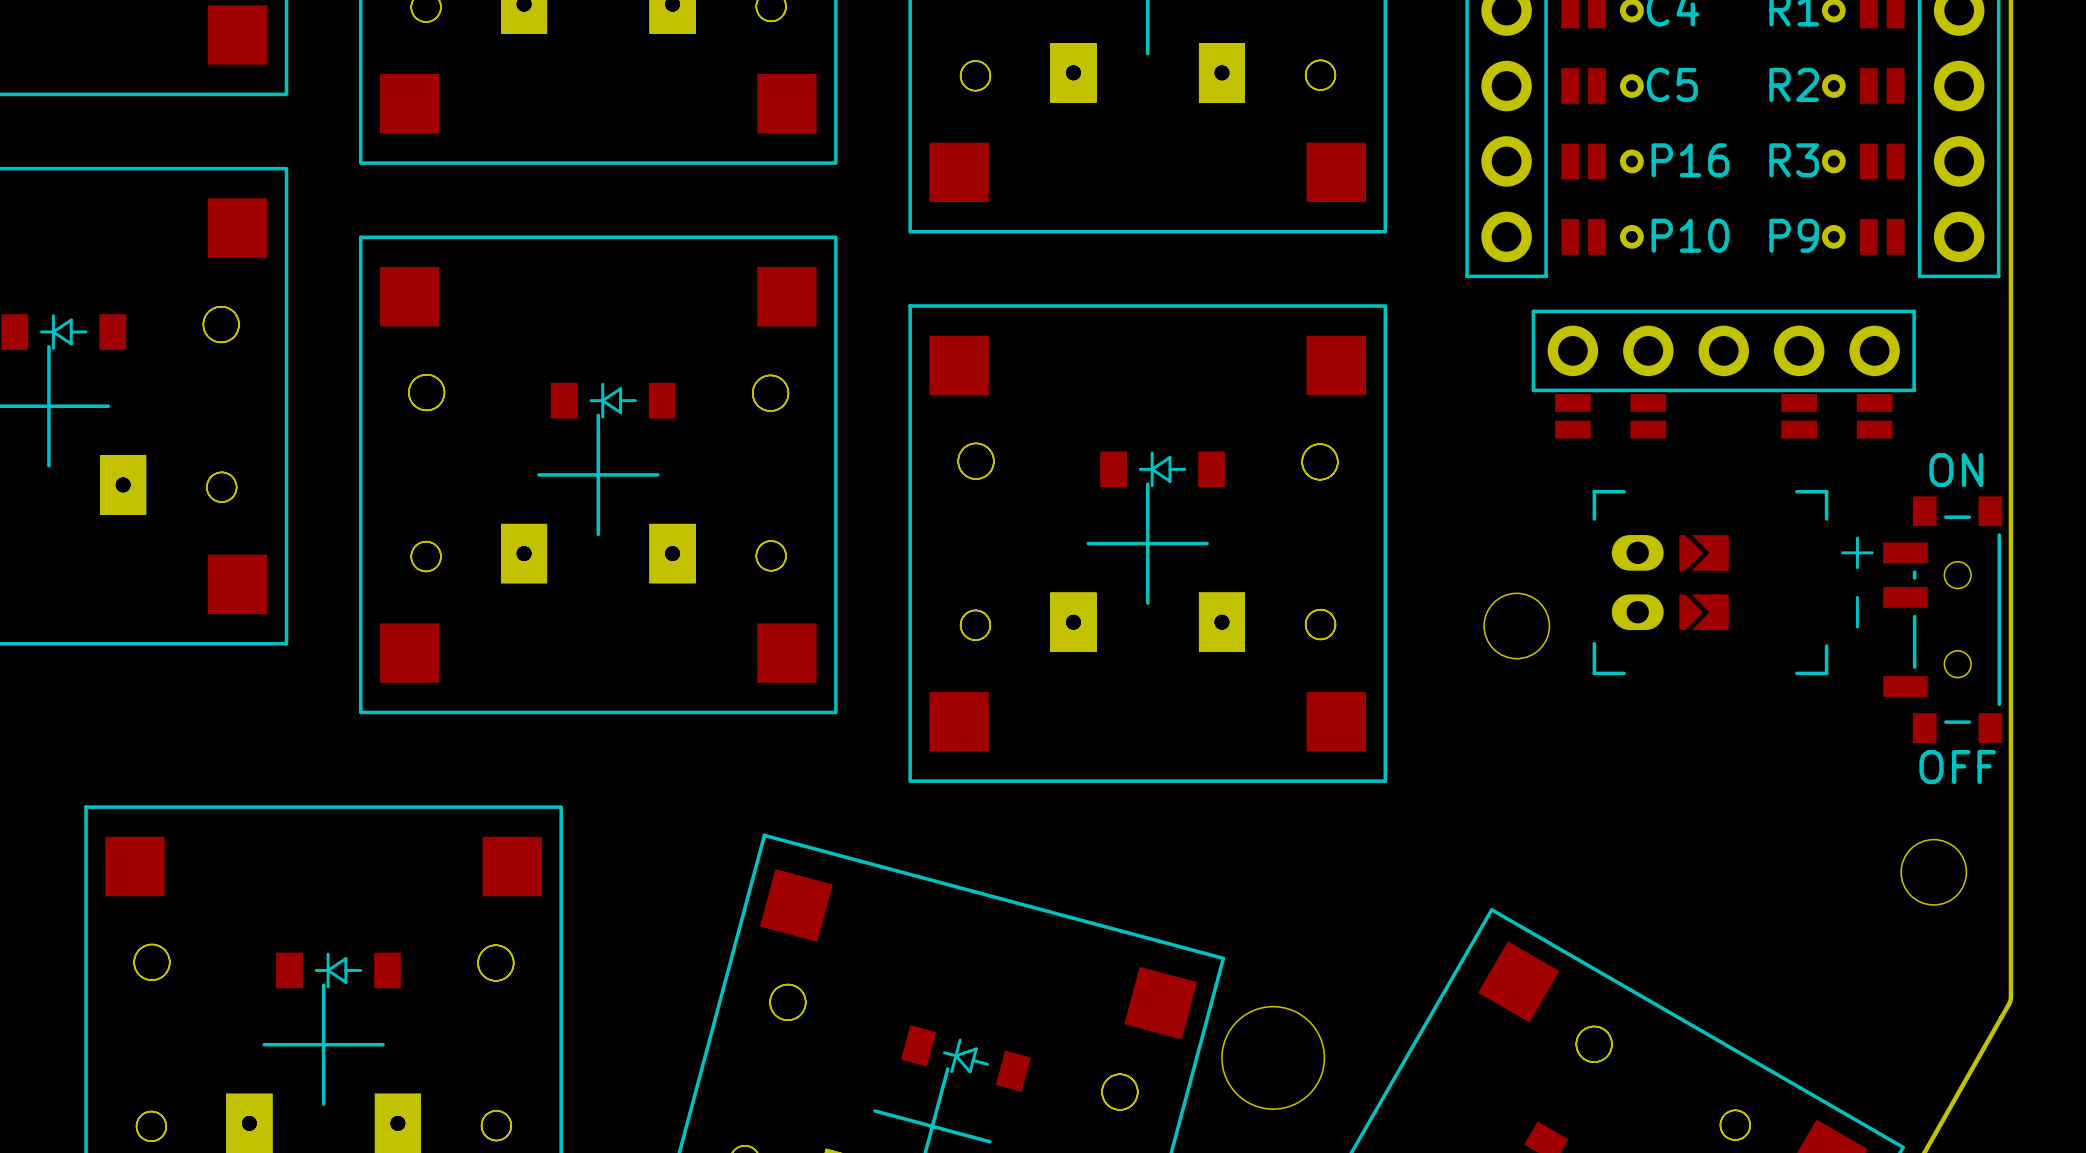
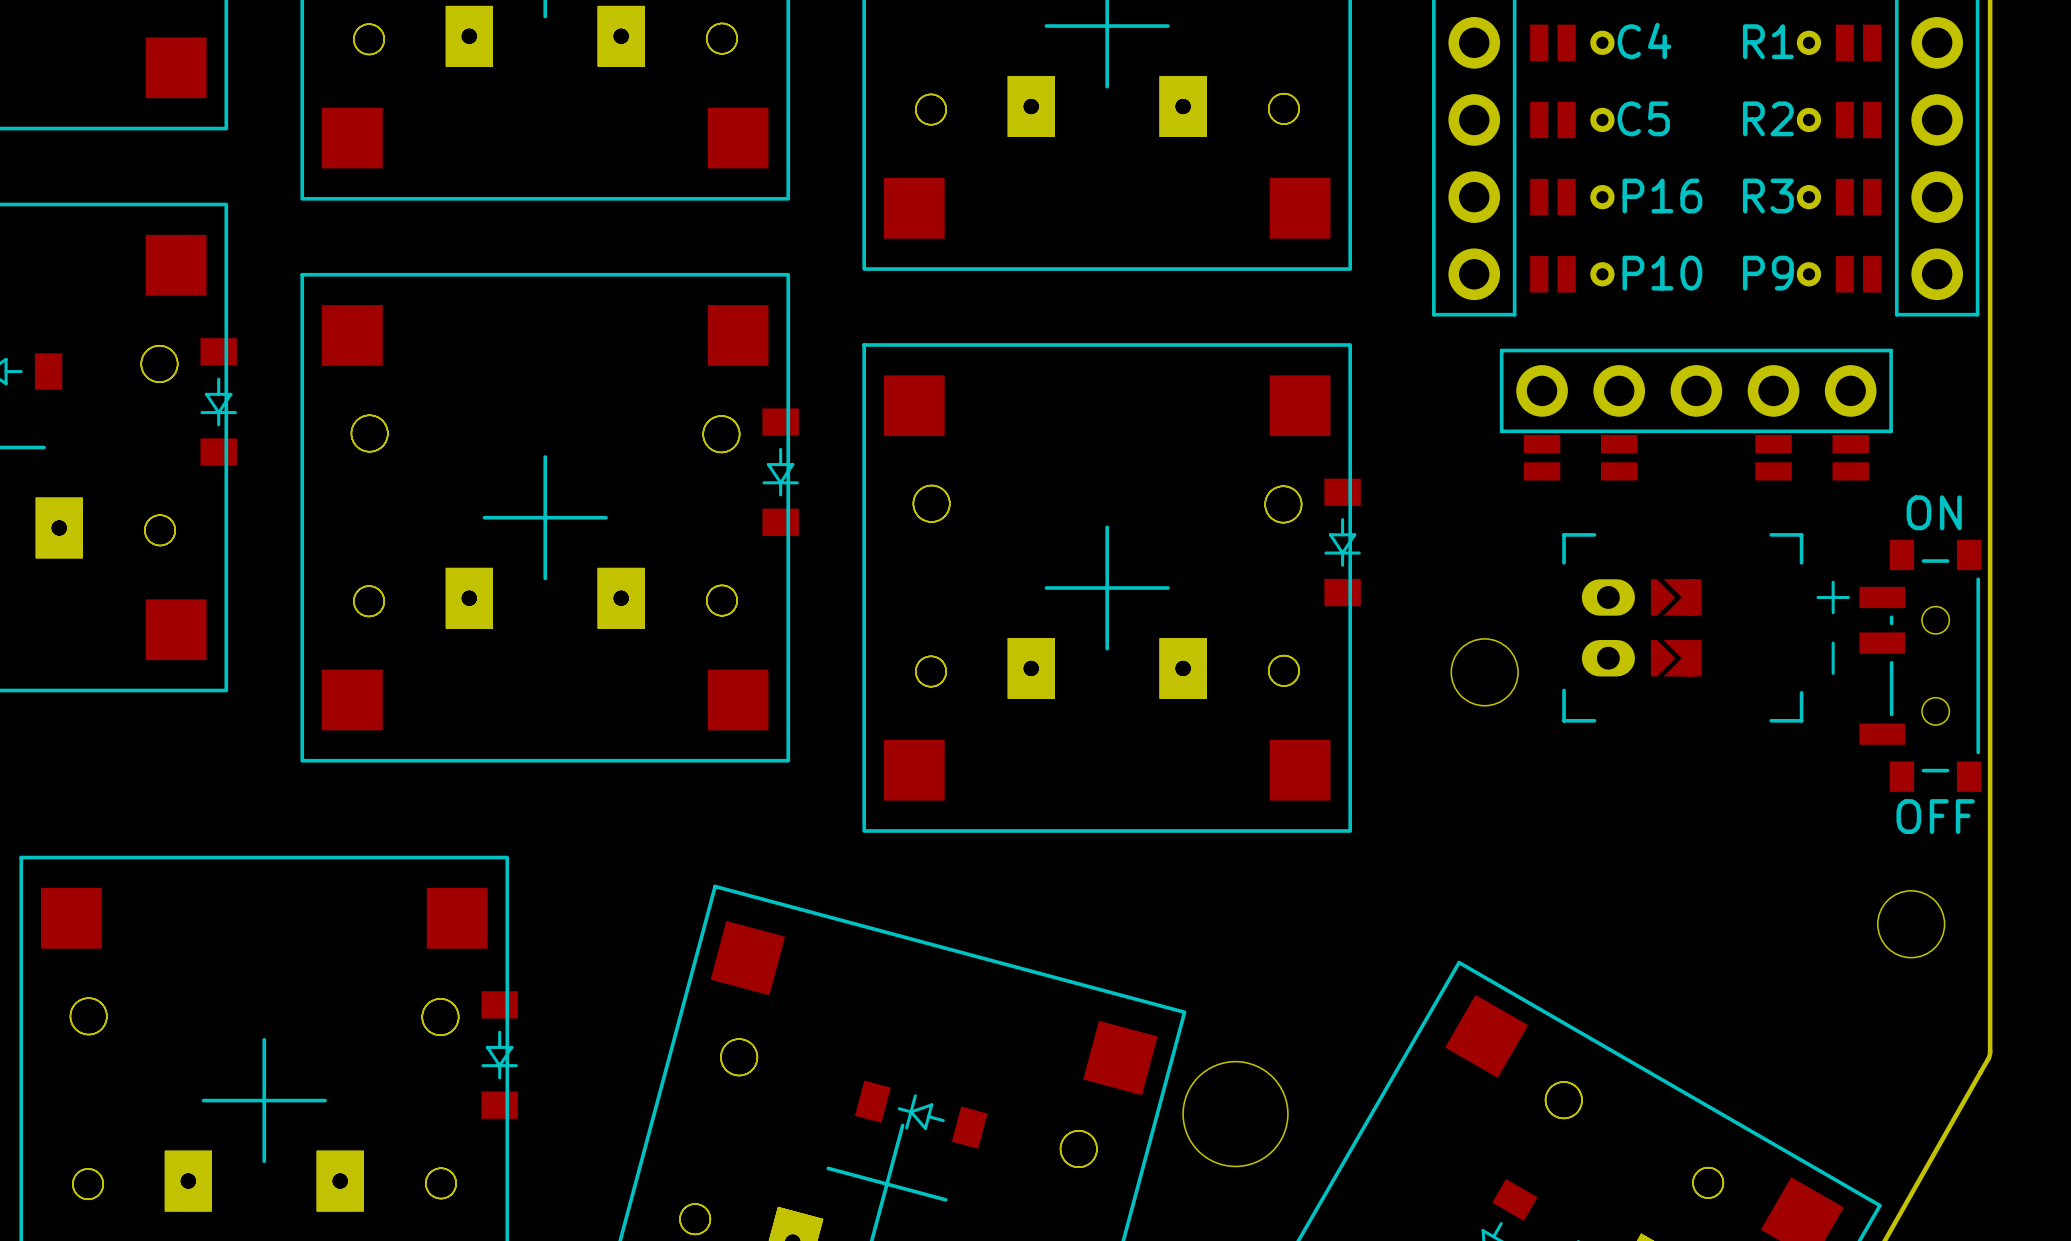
part: none -> (218, 401)
part: (613, 400) -> none
part: none -> (780, 472)
part: (1162, 469) -> none
part: none -> (1342, 542)
part rotation: 0° (338, 970) -> 90° counterclockwise (499, 1055)
part position: (338, 970) -> (499, 1055)

